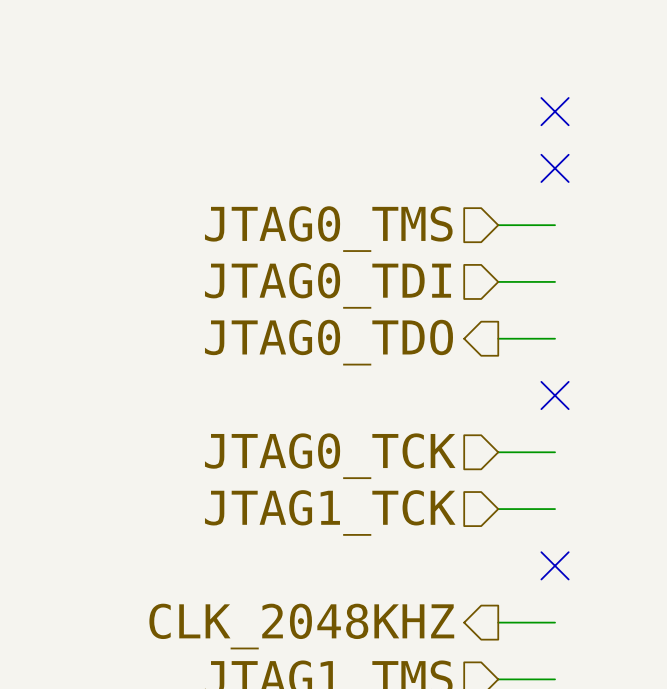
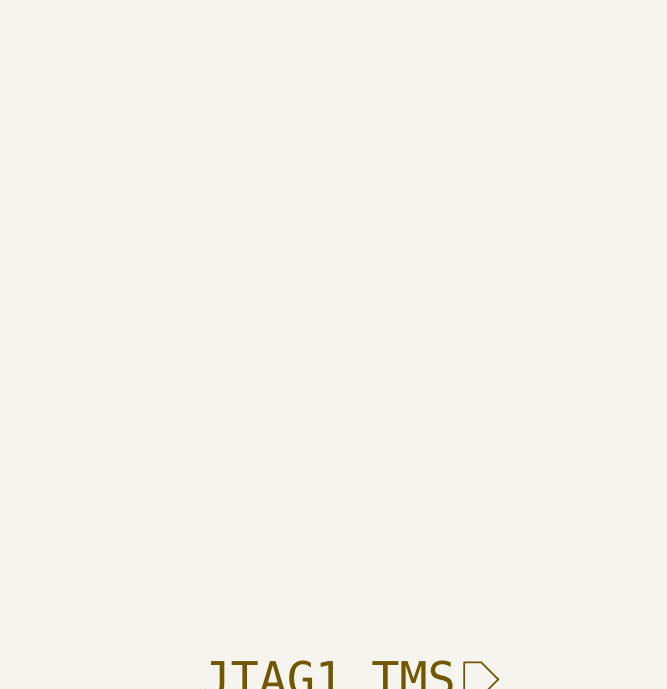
no-connect mark: (555, 111) -> none
no-connect mark: (555, 168) -> none
wire: (498, 225) (555, 225) -> none
hierarchical label: JTAG0_TMS (328, 229) -> none
wire: (498, 281) (555, 281) -> none
hierarchical label: JTAG0_TDI (328, 285) -> none
wire: (498, 338) (555, 338) -> none
hierarchical label: JTAG0_TDO (328, 342) -> none
no-connect mark: (555, 395) -> none
wire: (498, 452) (555, 452) -> none
hierarchical label: JTAG0_TCK (330, 456) -> none
wire: (498, 509) (555, 509) -> none
hierarchical label: JTAG1_TCK (330, 512) -> none
no-connect mark: (555, 565) -> none
wire: (498, 622) (555, 622) -> none
hierarchical label: CLK_2048KHZ (301, 626) -> none
wire: (498, 679) (555, 679) -> none

